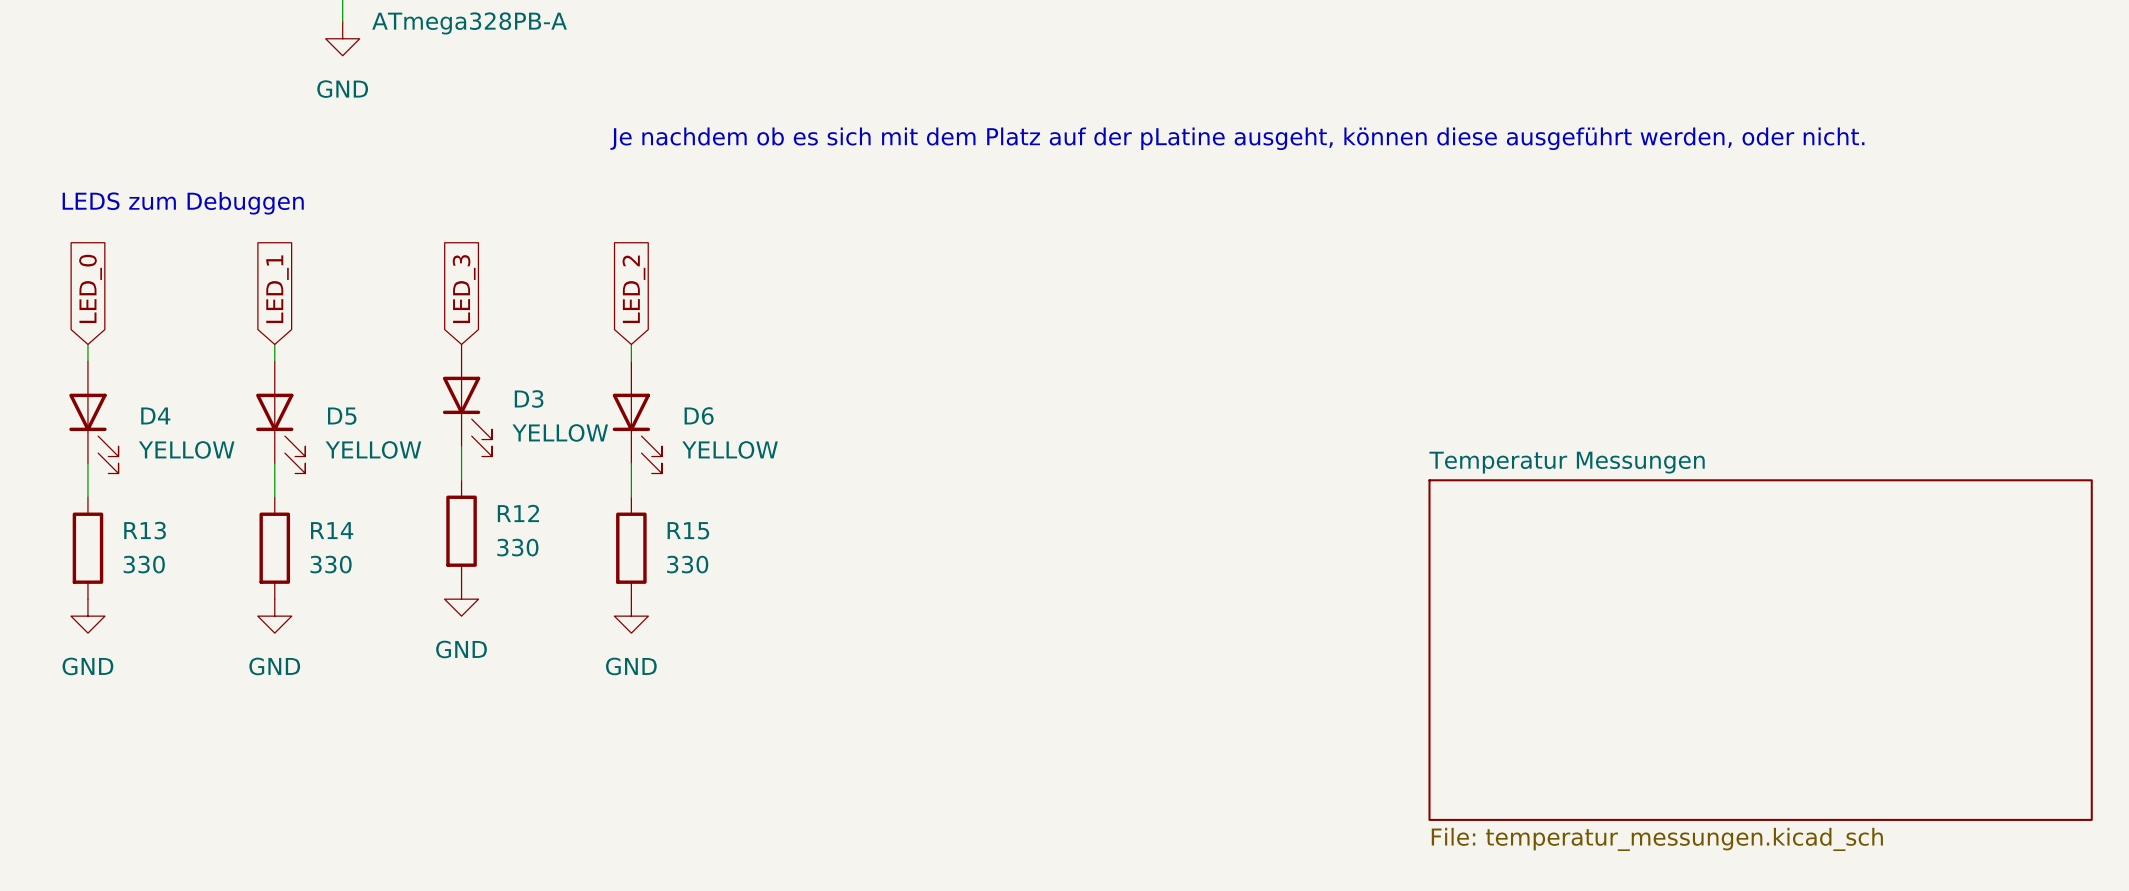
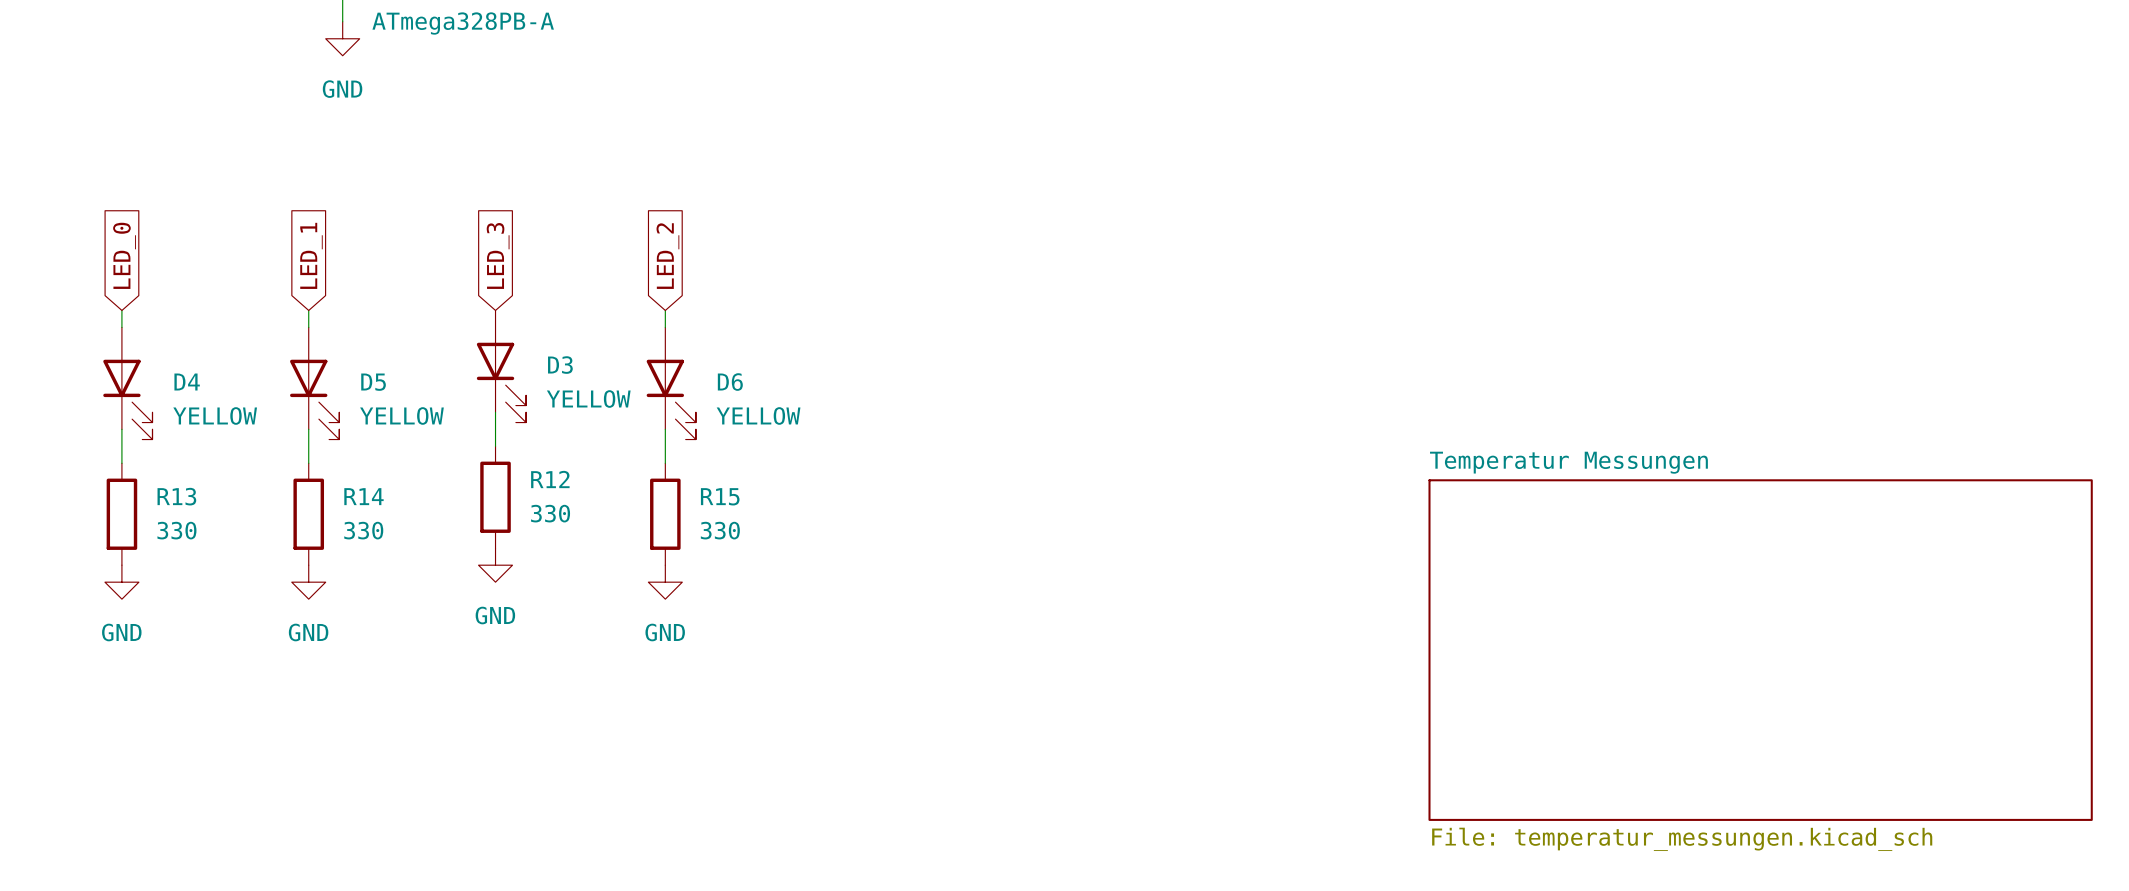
text: Je nachdem ob es sich mit dem Platz auf der pLatine ausgeht, können diese ausgeführt werden, oder nicht. (1237, 138) -> none
text: LEDS zum Debuggen (183, 203) -> none
global label position: LED_0 (90, 288) -> LED_0 (124, 255)
global label position: LED_1 (277, 289) -> LED_1 (311, 255)
global label position: LED_3 (464, 289) -> LED_3 (498, 255)
global label position: LED_2 (633, 289) -> LED_2 (667, 256)
wire: (87, 344) (87, 361) -> (121, 310) (121, 327)
wire: (274, 344) (274, 361) -> (308, 310) (308, 327)
wire: (631, 344) (631, 361) -> (665, 310) (665, 327)
D3 position: (467, 400) -> (501, 366)
D4 position: (93, 417) -> (127, 383)
D5 position: (280, 417) -> (314, 383)
D6 position: (637, 417) -> (671, 383)
wire: (461, 446) (461, 480) -> (495, 412) (495, 446)
wire: (87, 463) (87, 497) -> (121, 429) (121, 463)
wire: (274, 463) (274, 497) -> (308, 429) (308, 463)
wire: (631, 463) (631, 497) -> (665, 429) (665, 463)
R12 position: (461, 531) -> (495, 497)
R13 position: (87, 548) -> (121, 514)
R14 position: (274, 548) -> (308, 514)
R15 position: (631, 548) -> (665, 514)
power symbol position: GND (461, 599) -> GND (495, 565)
power symbol position: GND (87, 616) -> GND (121, 582)
power symbol position: GND (274, 616) -> GND (308, 582)
power symbol position: GND (631, 616) -> GND (665, 582)

